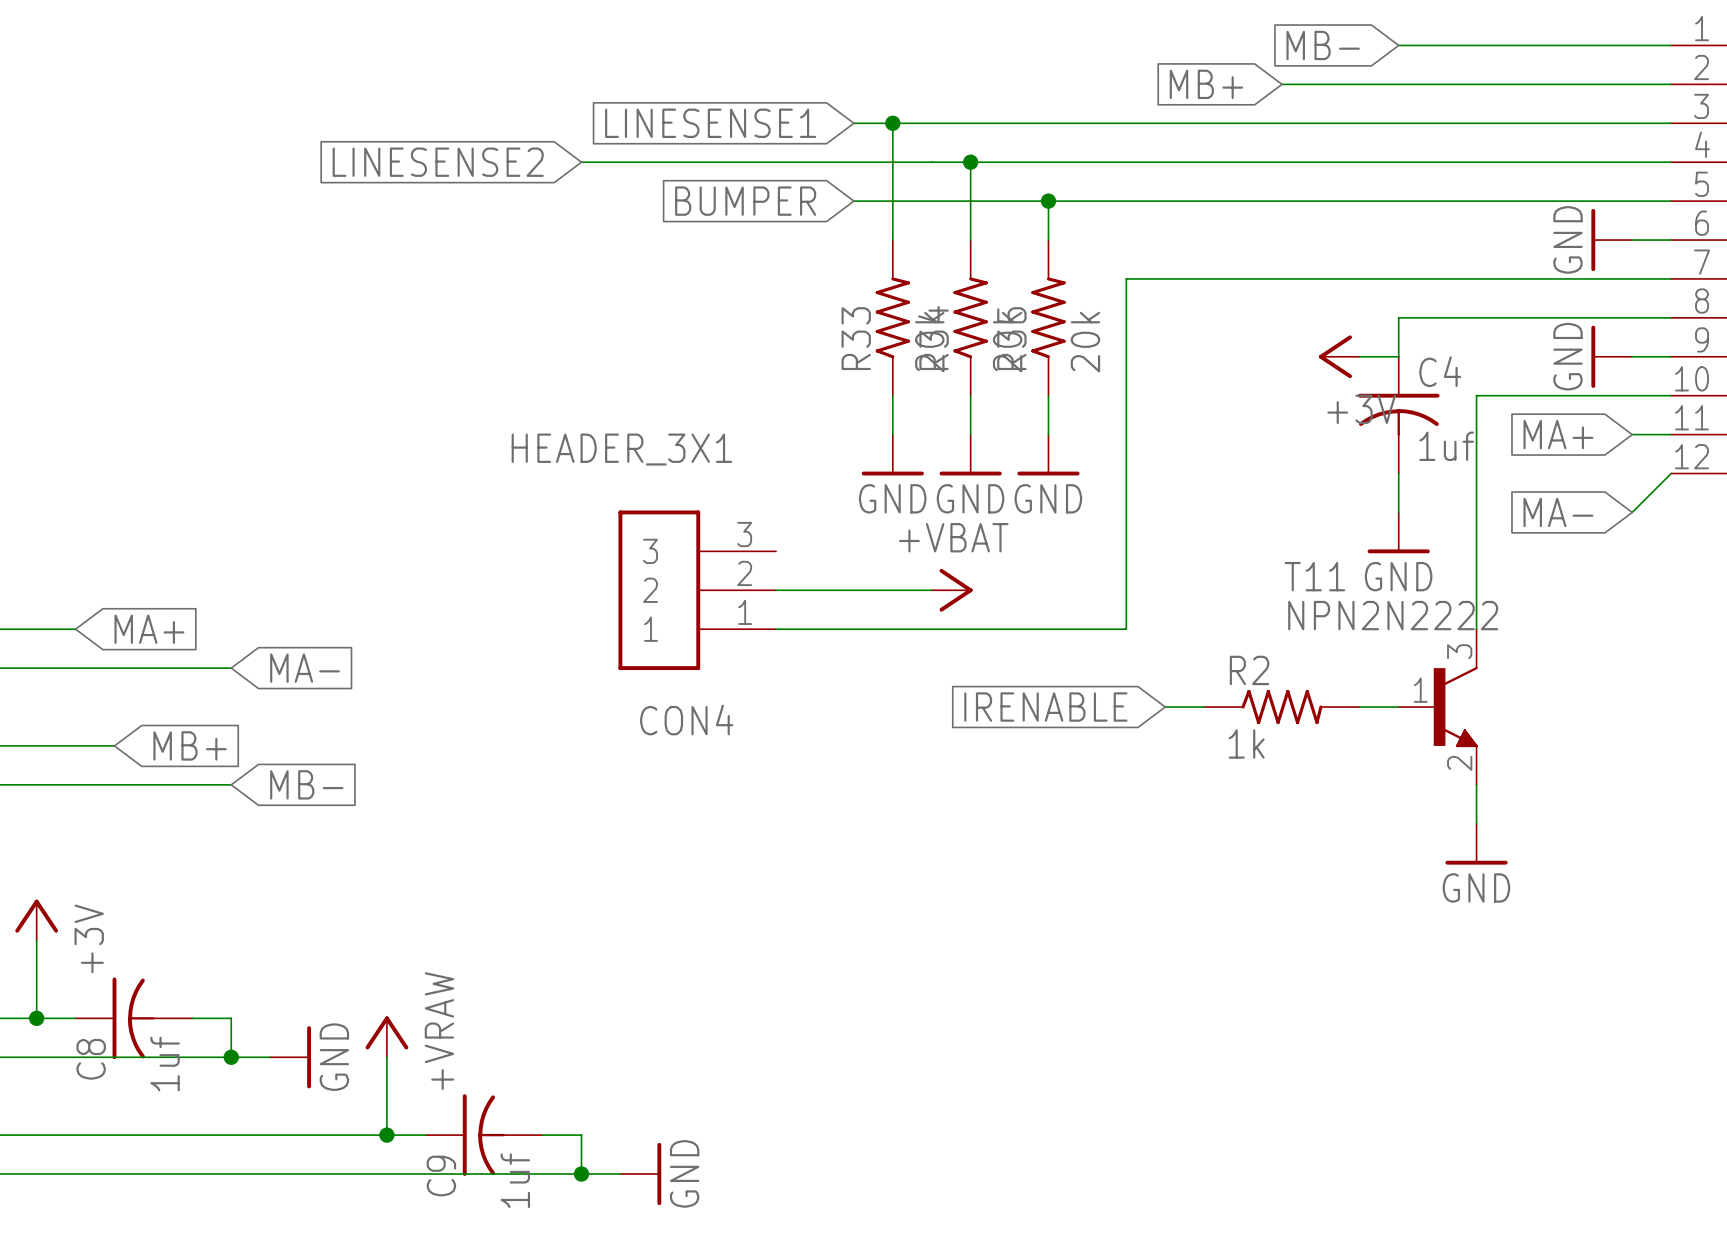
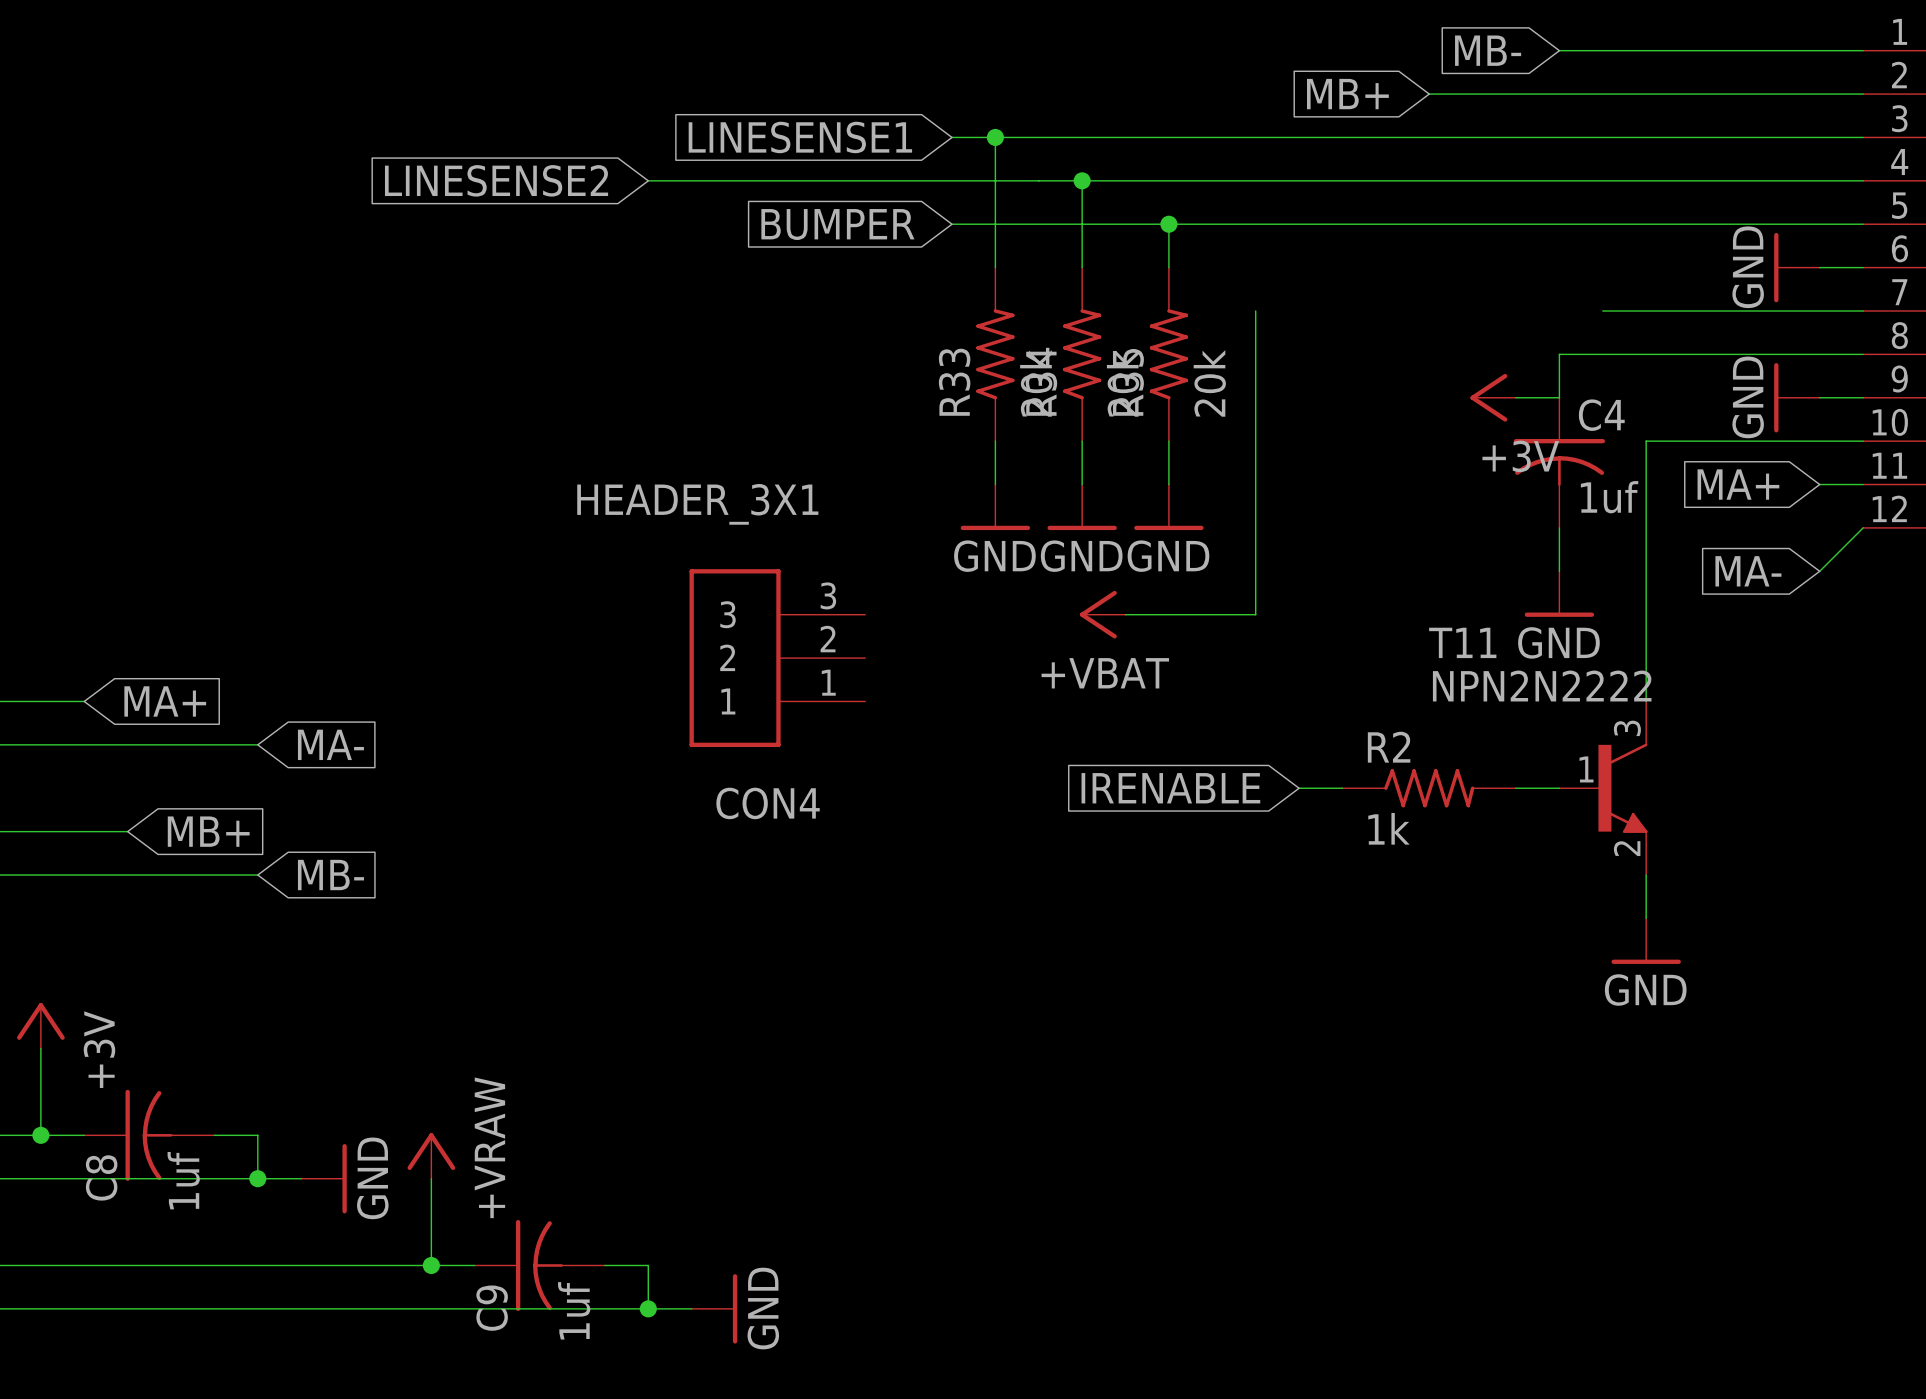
wire: (1126, 278) (1437, 278) -> none
wire: (1126, 551) (1126, 629) (776, 629) -> (1255, 614) (1125, 614)
wire: (776, 590) (931, 590) -> none
power symbol position: +VBAT (952, 590) -> +VBAT (1102, 614)
power symbol rotation: 0° (956, 590) -> 180° (1098, 614)

